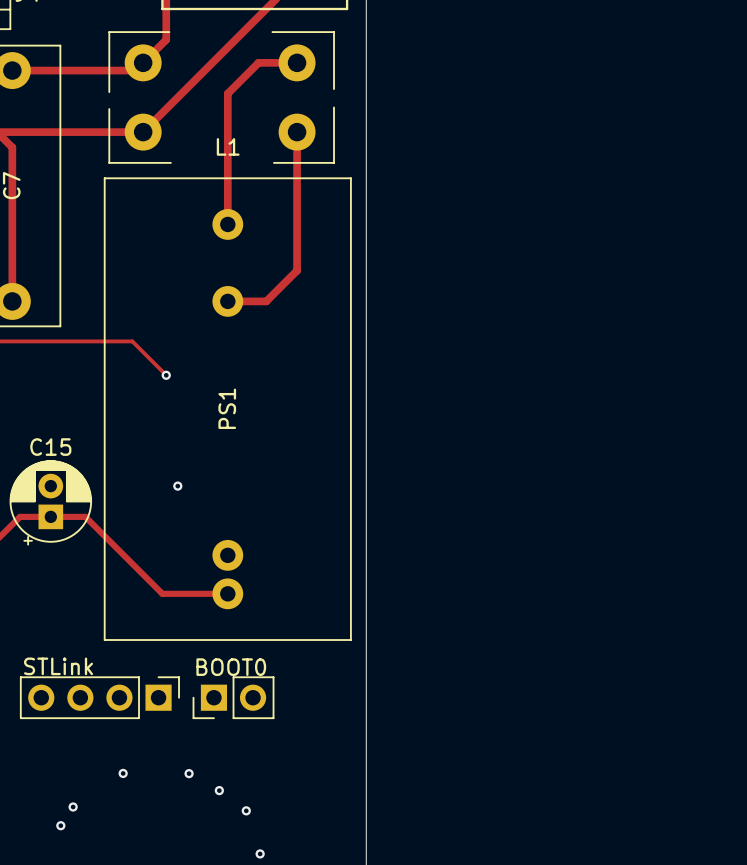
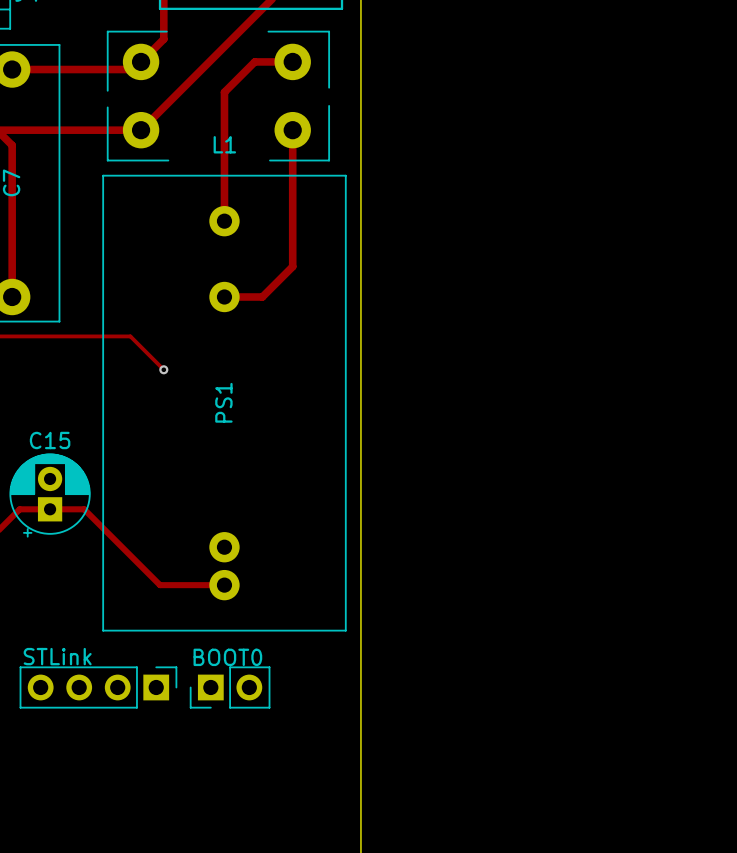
via: (177, 486) -> none
via: (123, 773) -> none
via: (189, 773) -> none
via: (219, 790) -> none
via: (73, 806) -> none
via: (246, 810) -> none
via: (60, 825) -> none
via: (260, 853) -> none

